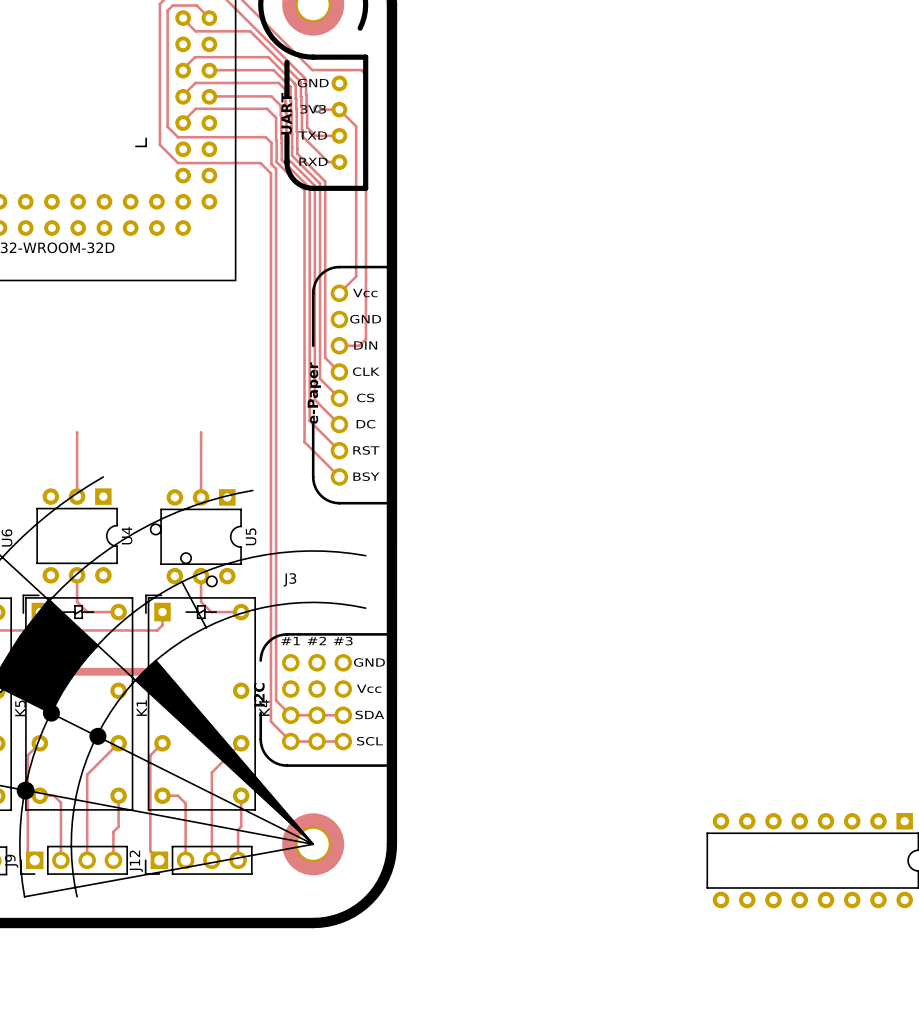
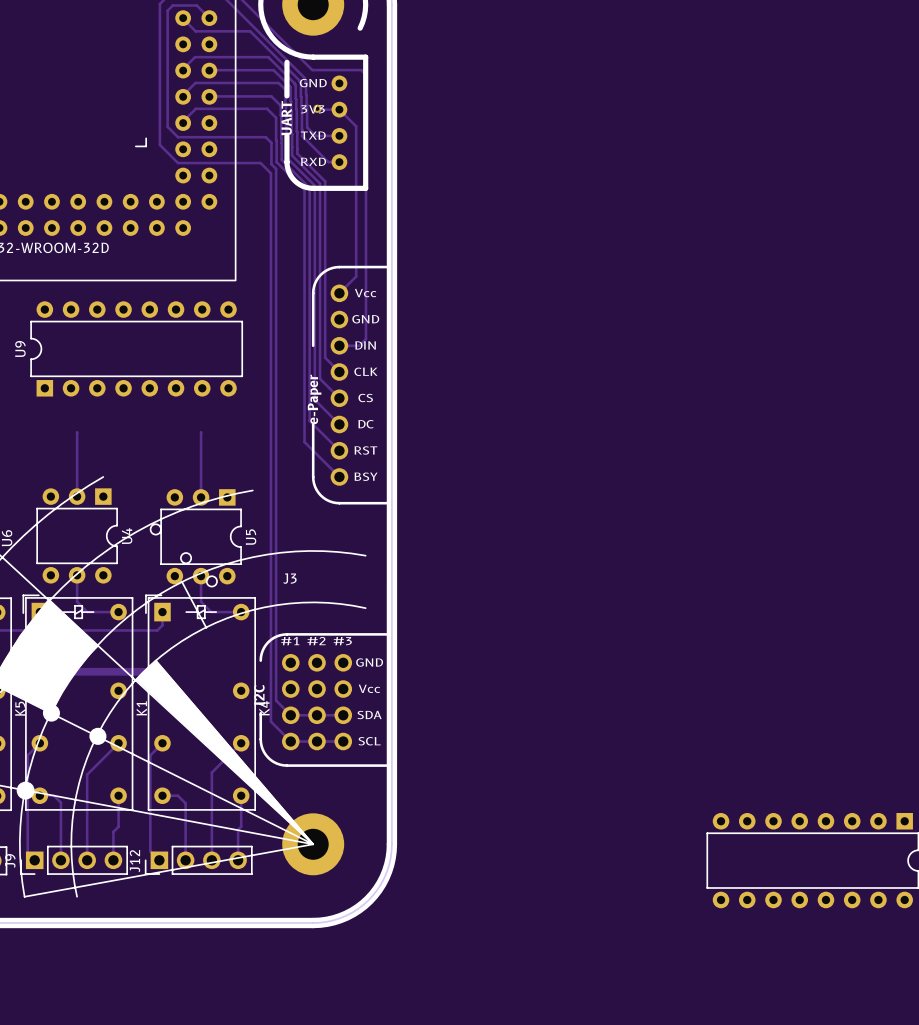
U9: none -> (136, 348)

